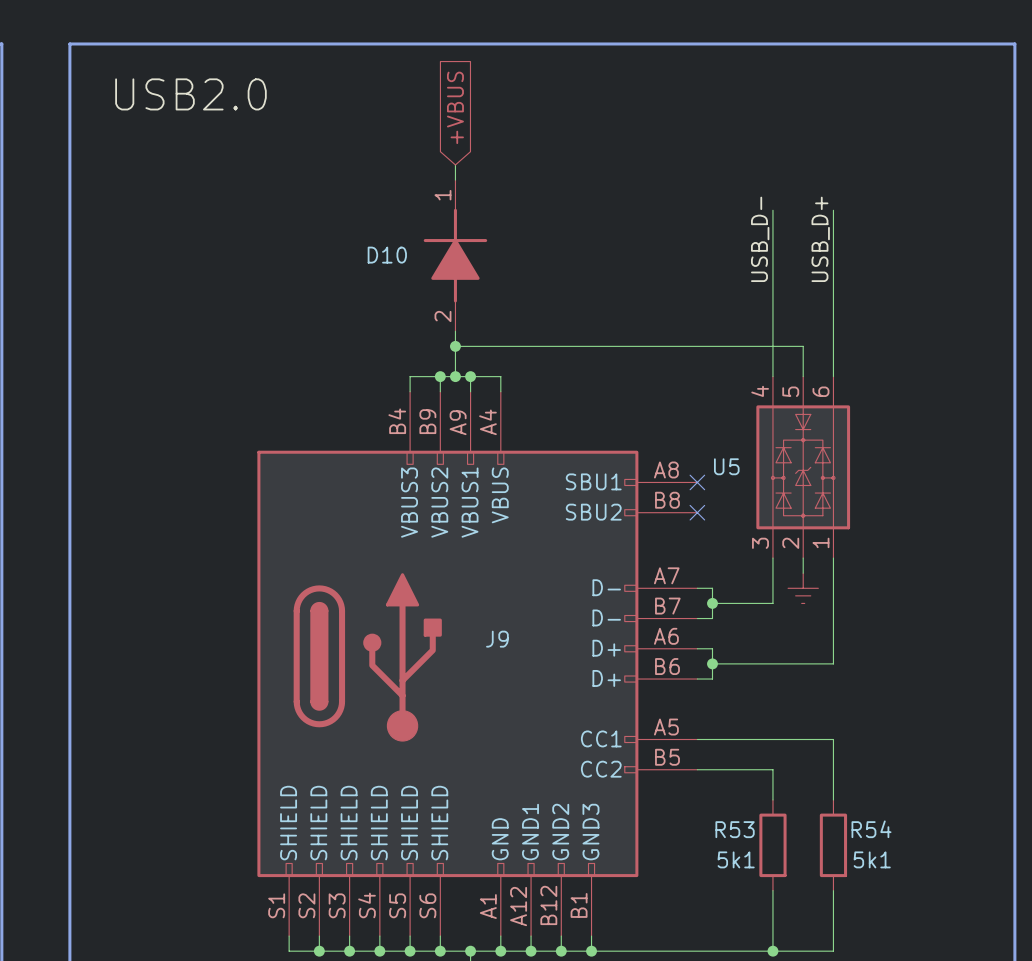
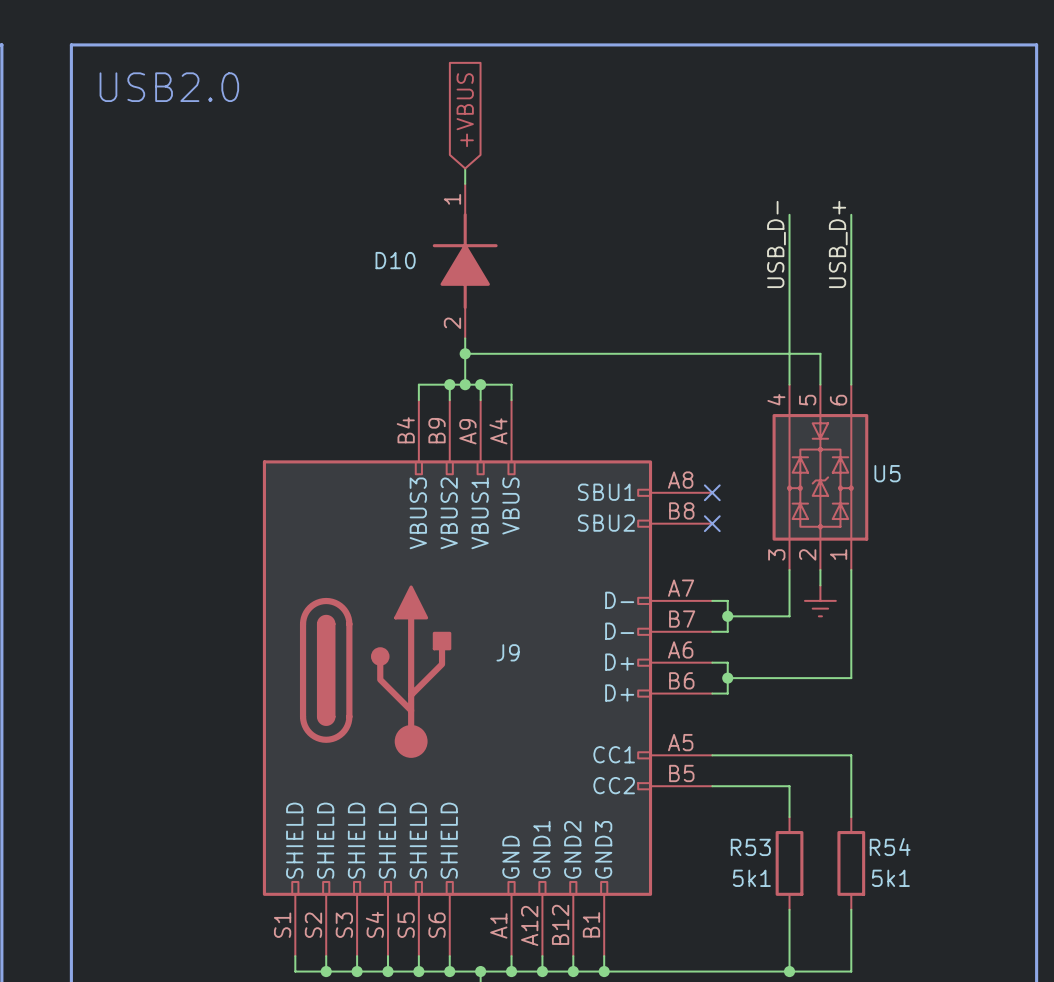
text: none -> USB2.0 (169, 87)
label: USB2.0 (190, 94) -> none
U5 name position: U5 (726, 466) -> U5 (887, 473)

